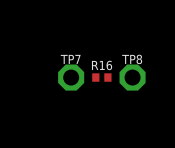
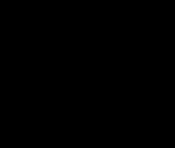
TP7: (71, 77) -> none
R16: (101, 77) -> none
TP8: (132, 77) -> none

